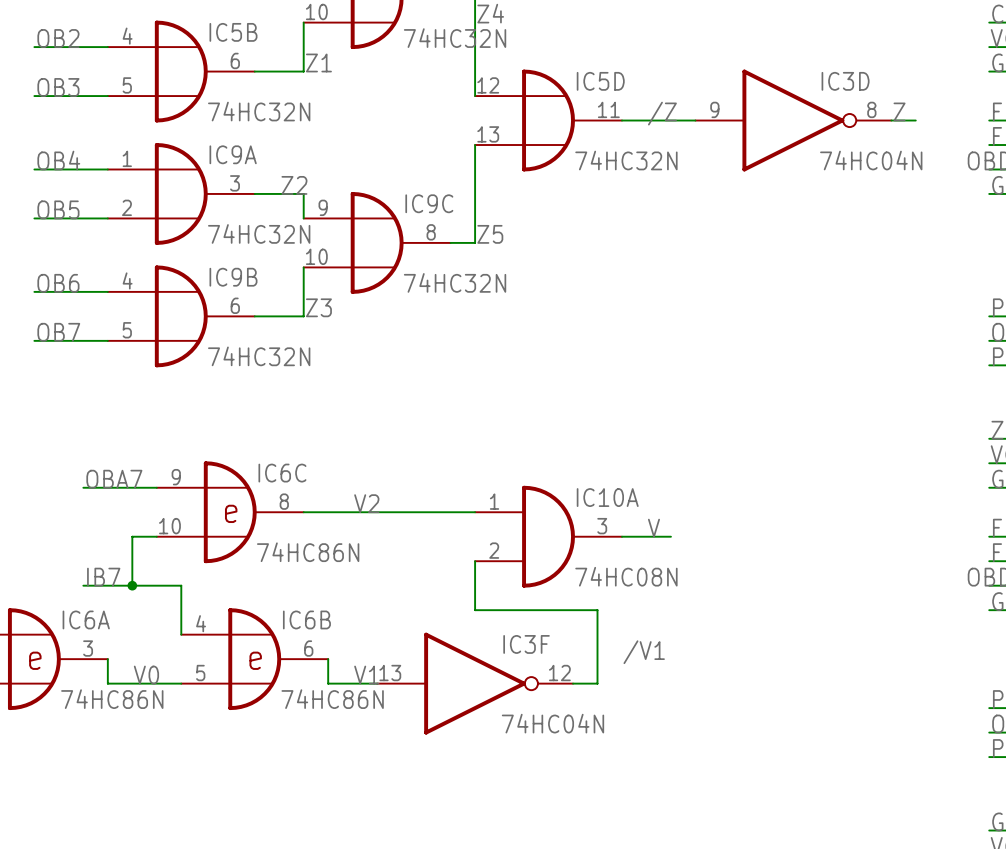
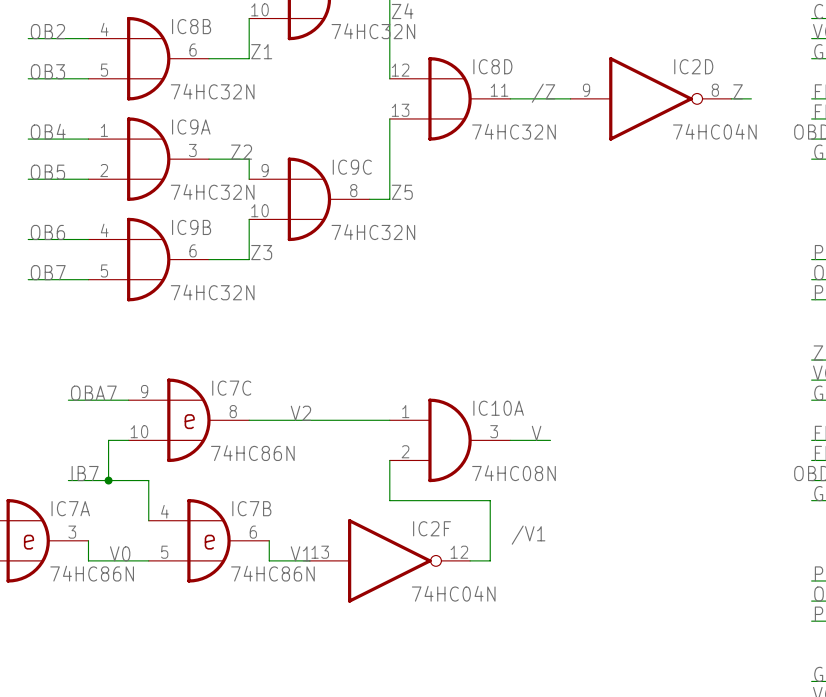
IC5B name: IC5B (233, 32) -> IC8B (191, 26)
IC5D name: IC5D (600, 81) -> IC8D (492, 66)
IC3D name: IC3D (845, 81) -> IC2D (693, 66)
IC6C name: IC6C (282, 473) -> IC7C (231, 388)
IC6A name: IC6A (86, 619) -> IC7A (70, 508)
IC6B name: IC6B (306, 619) -> IC7B (251, 508)
IC3F name: IC3F (526, 644) -> IC2F (432, 528)

